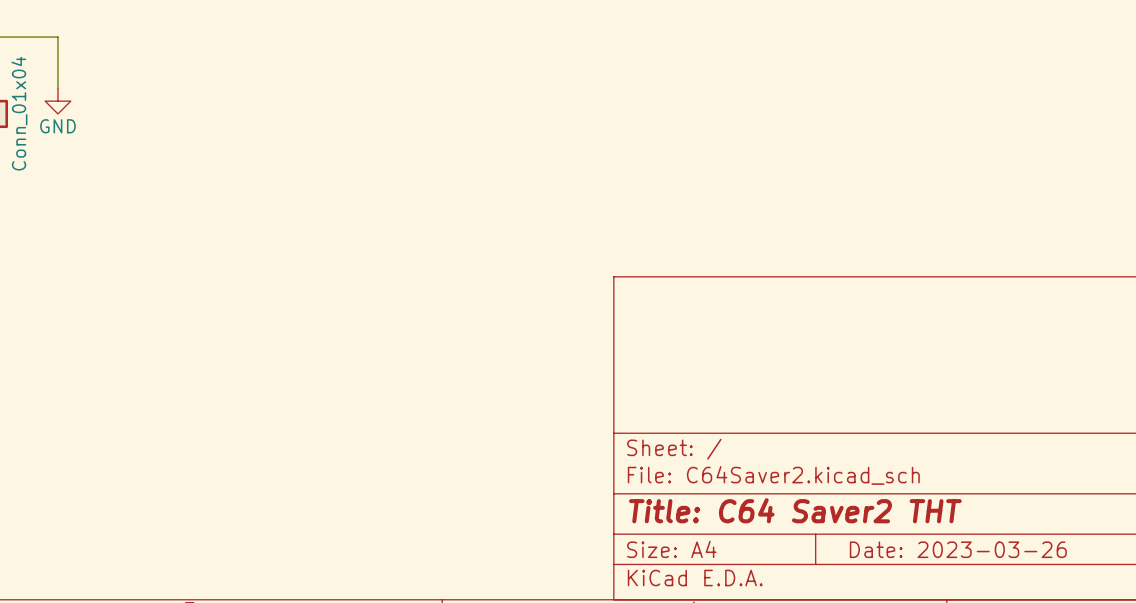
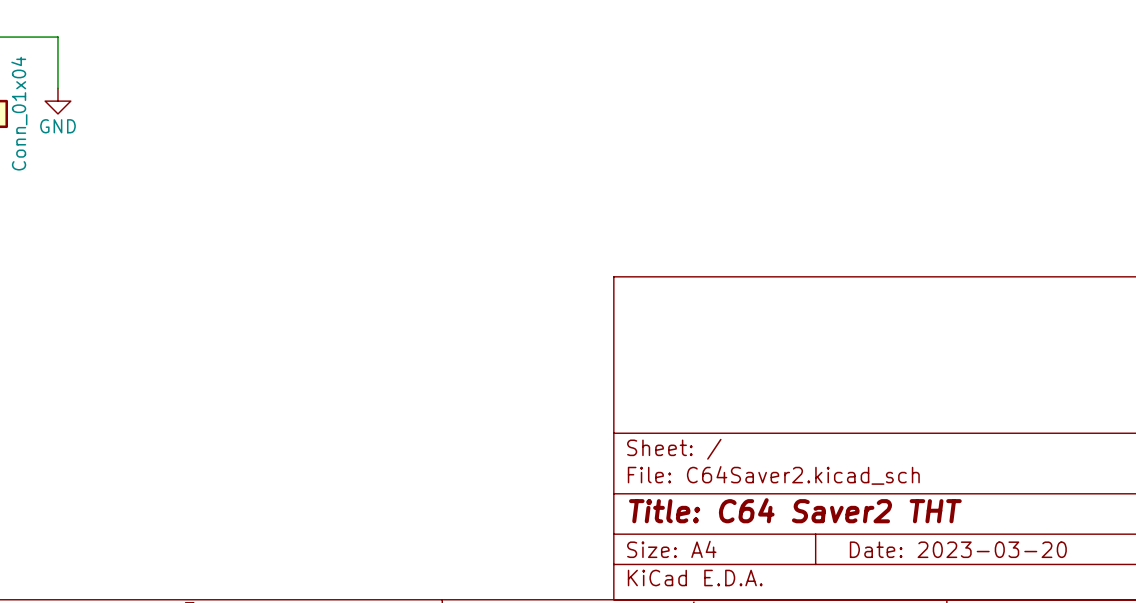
title block: Date: 2023-03-26 (958, 549) -> Date: 2023-03-20 (958, 549)

